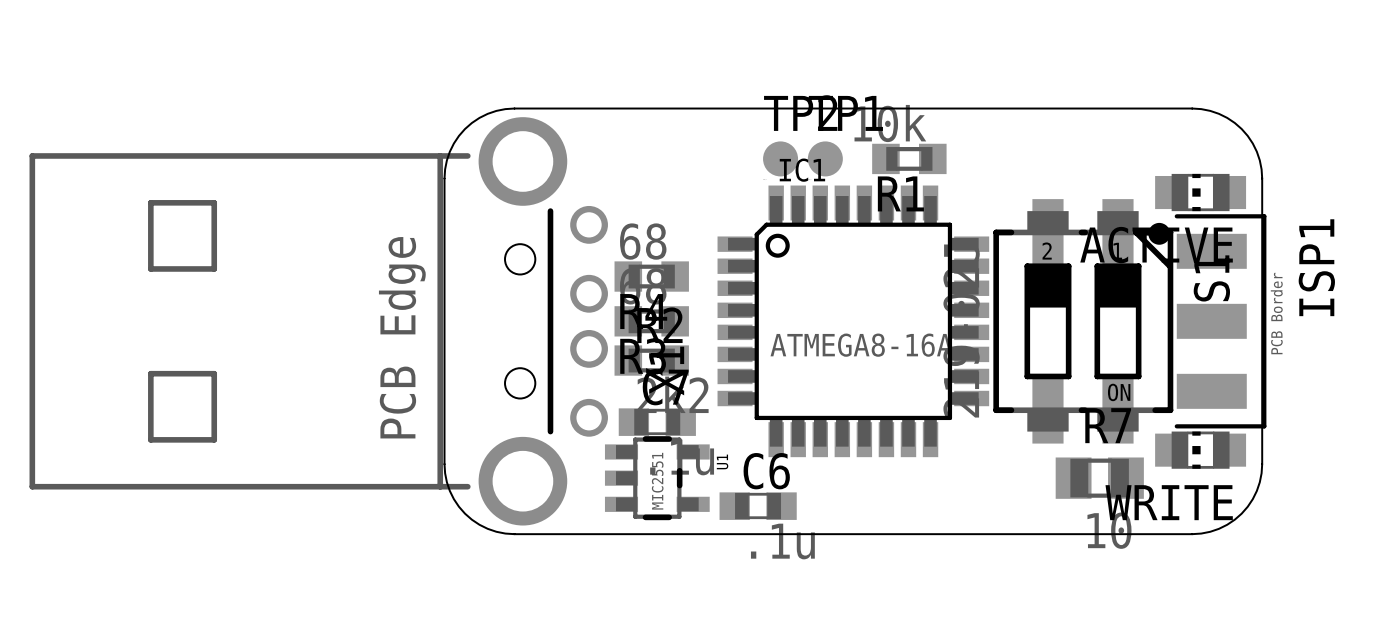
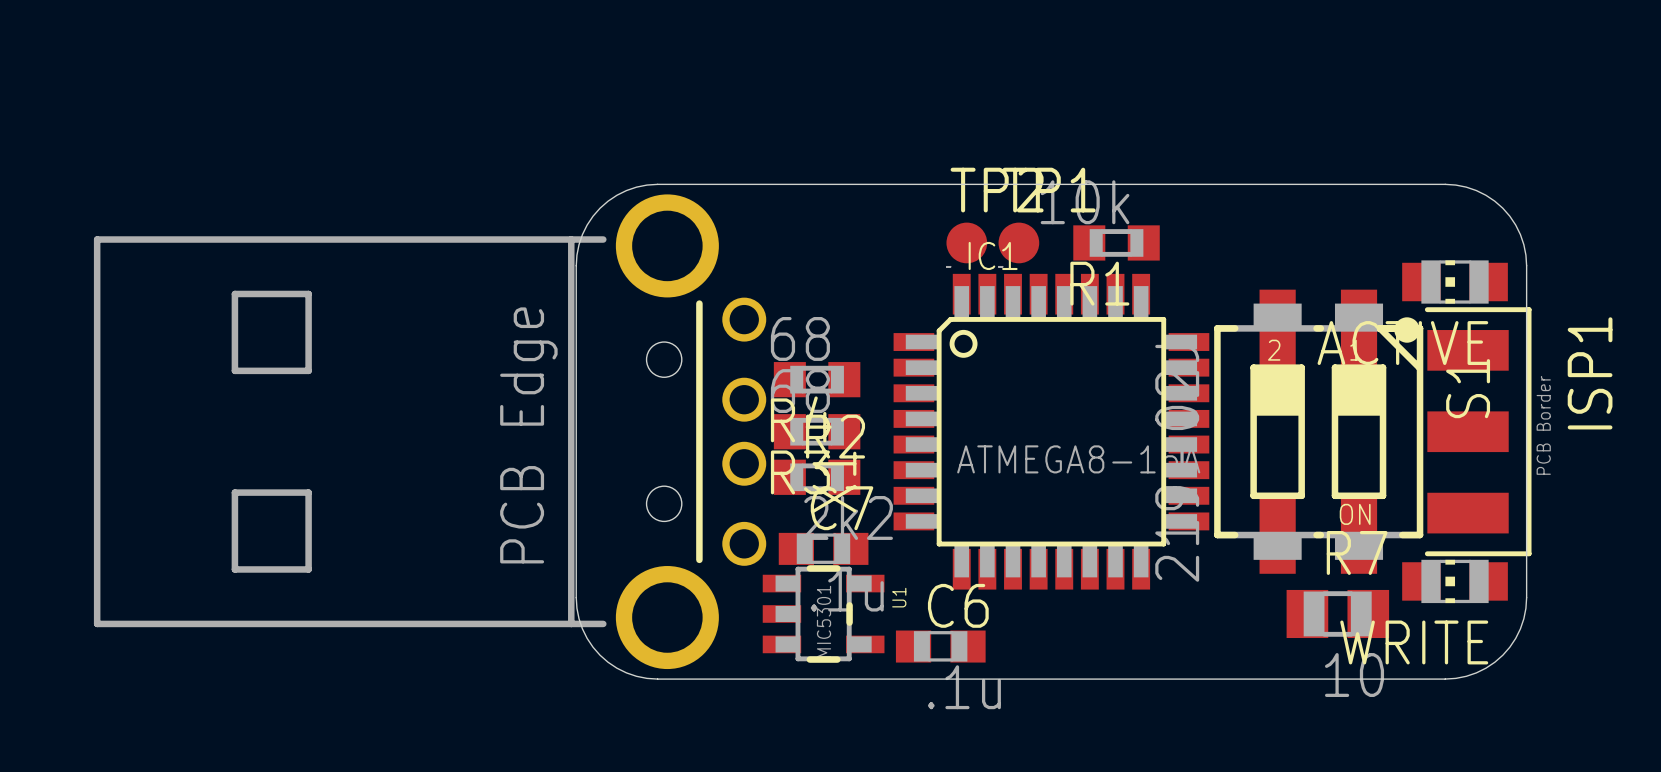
U1 value: MIC2551 (657, 481) -> MIC5301 (824, 621)

